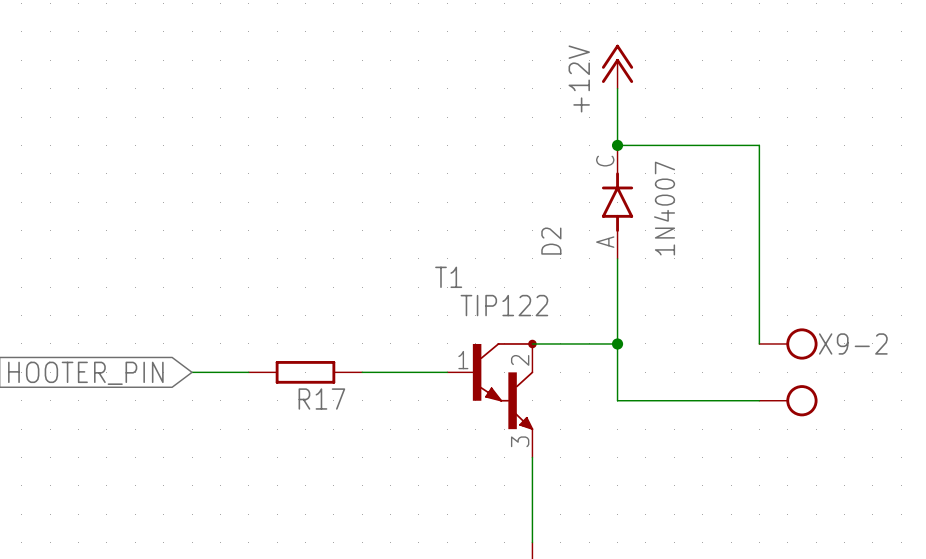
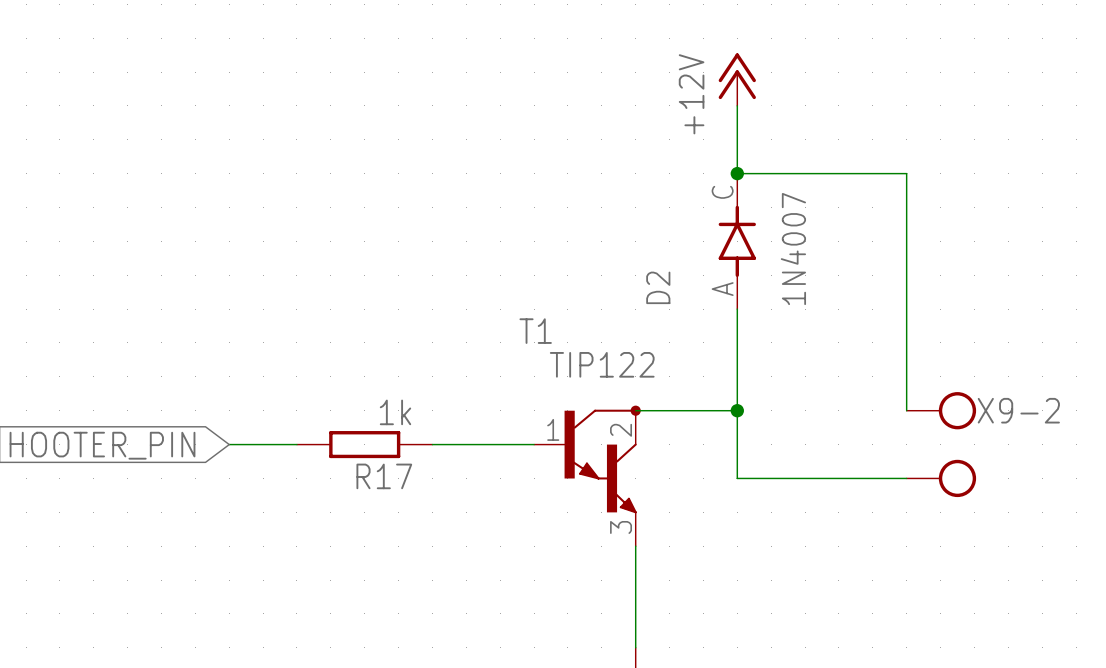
R17 value: none -> 1k (395, 412)

